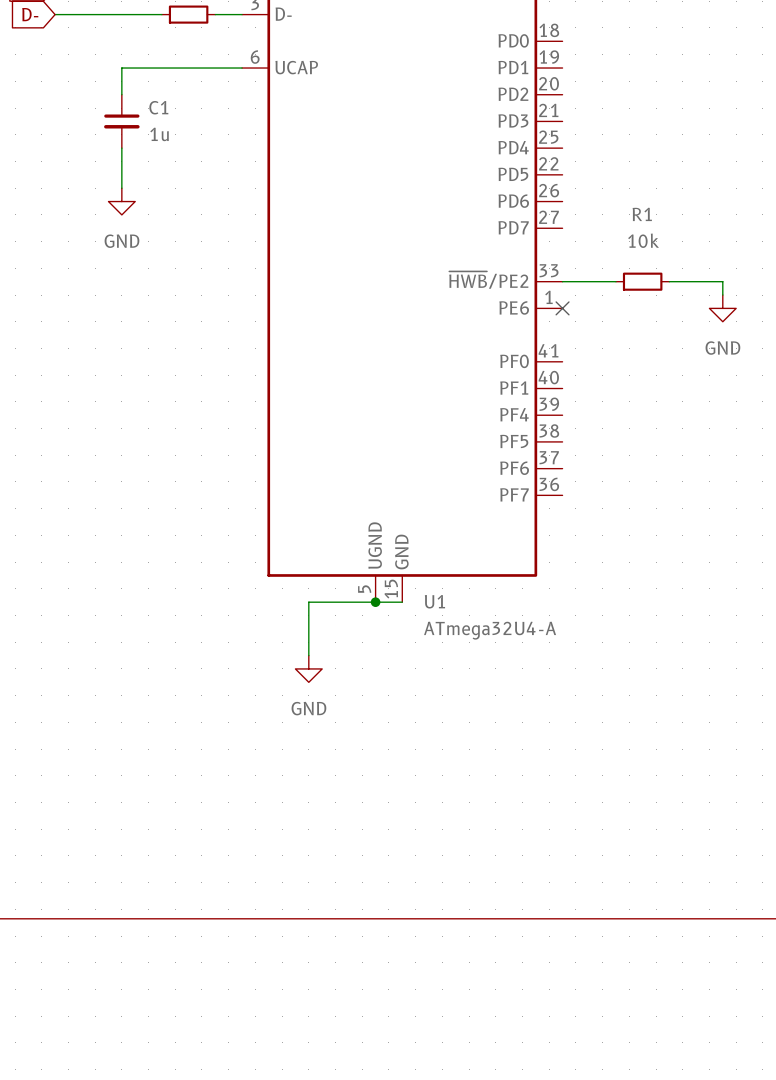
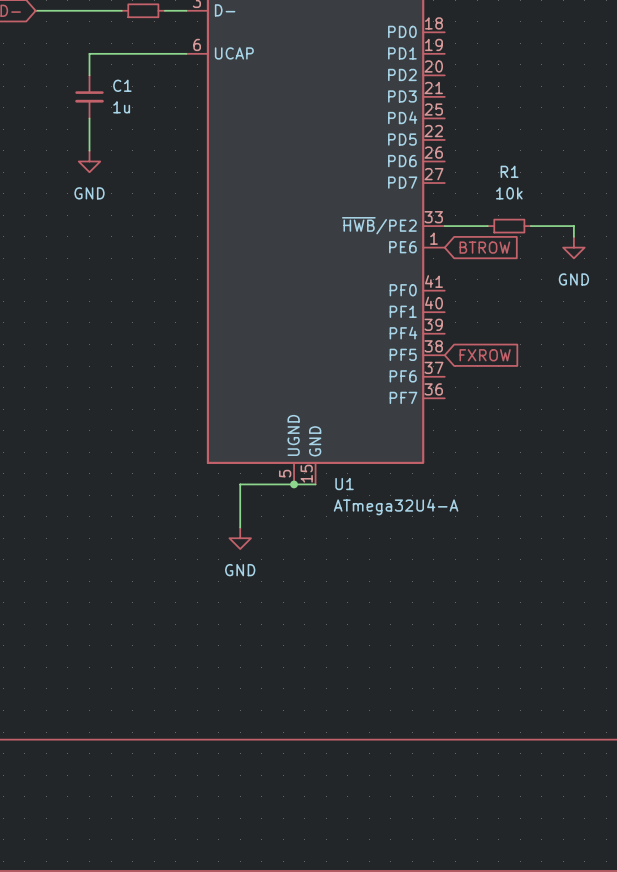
no-connect mark: (562, 308) -> none
global label: none -> BTROW (484, 247)
global label: none -> FXROW (485, 355)

